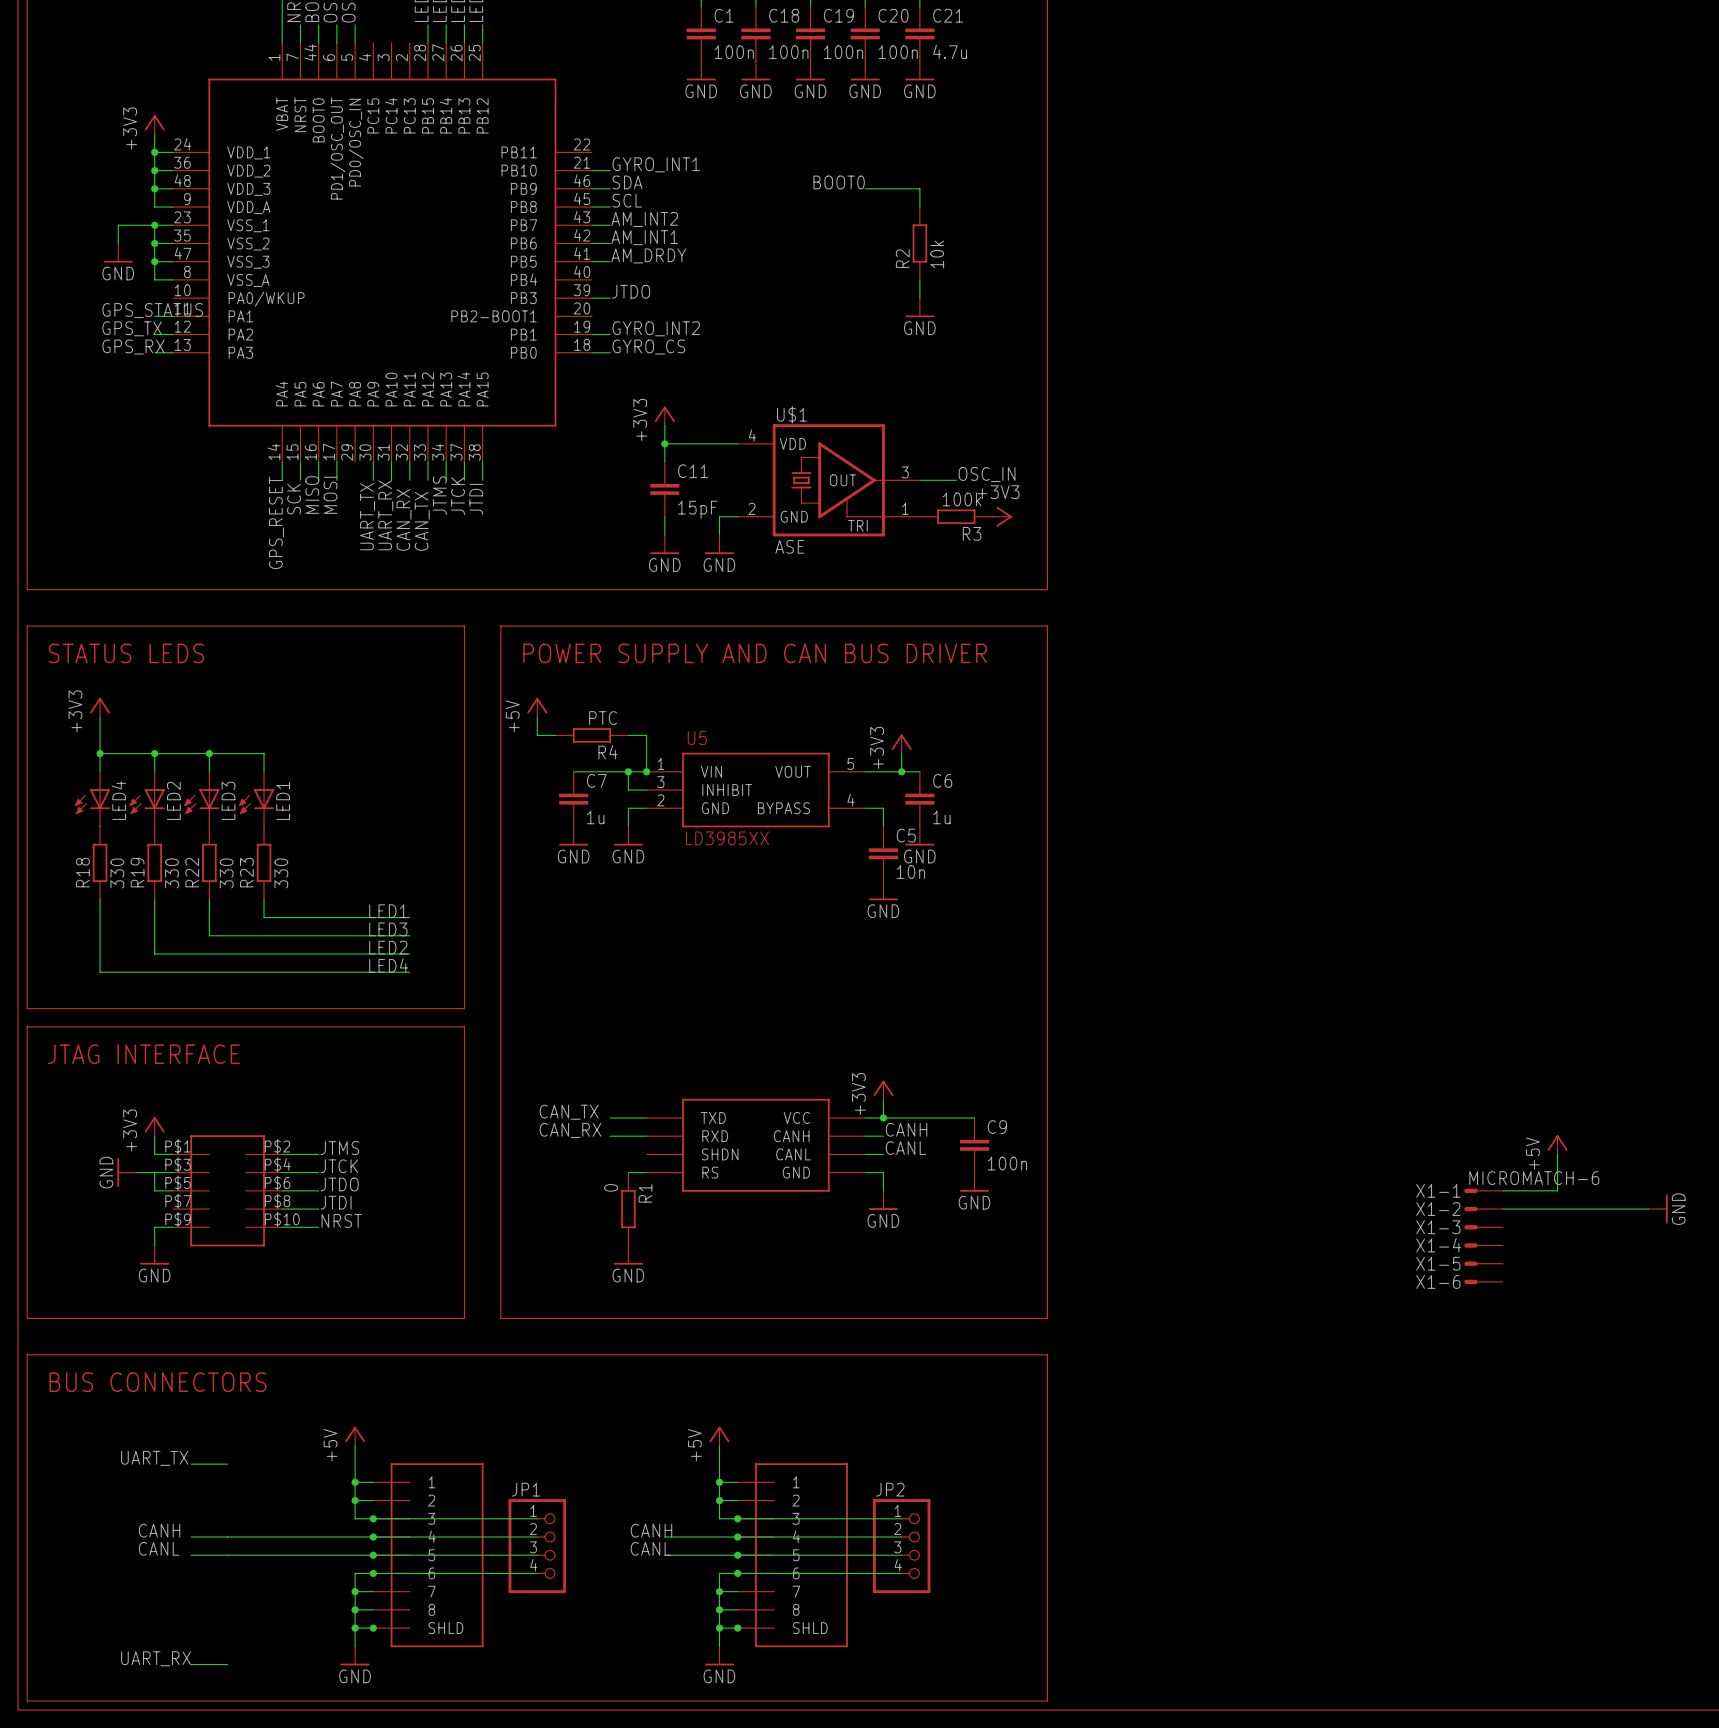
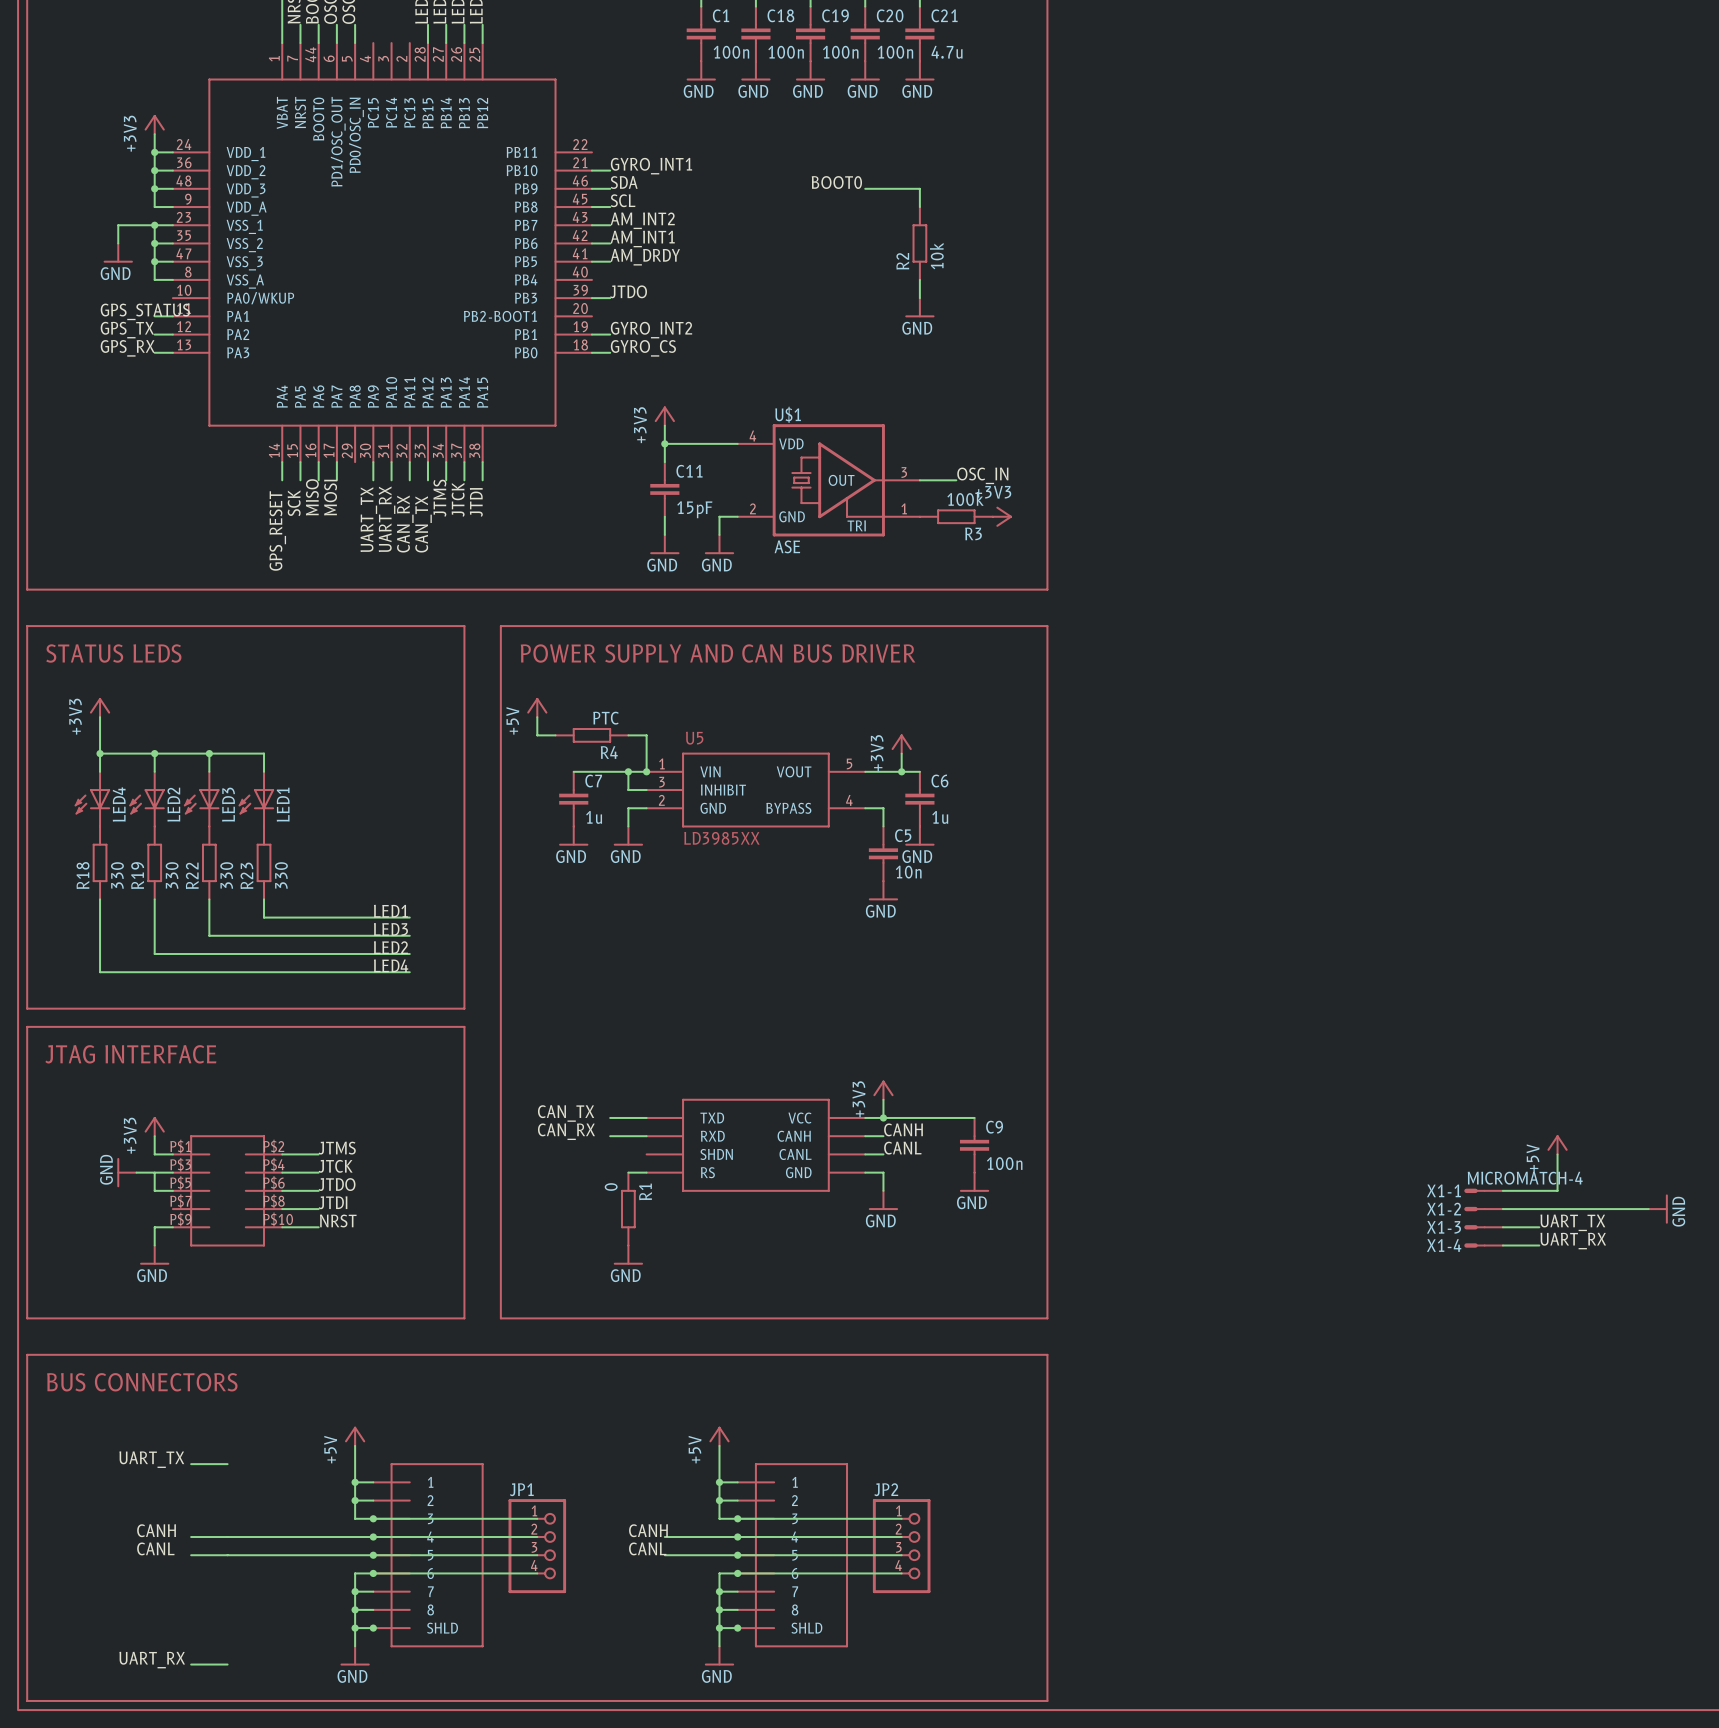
X1-1 value: MICROMATCH-6 (1534, 1178) -> MICROMATCH-4 (1525, 1178)
label: none -> UART_TX (1572, 1222)
wire: none -> (1502, 1227) (1539, 1227)
label: none -> UART_RX (1573, 1241)
wire: none -> (1502, 1245) (1539, 1245)
X1-5: (1483, 1263) -> none
X1-6: (1483, 1281) -> none

